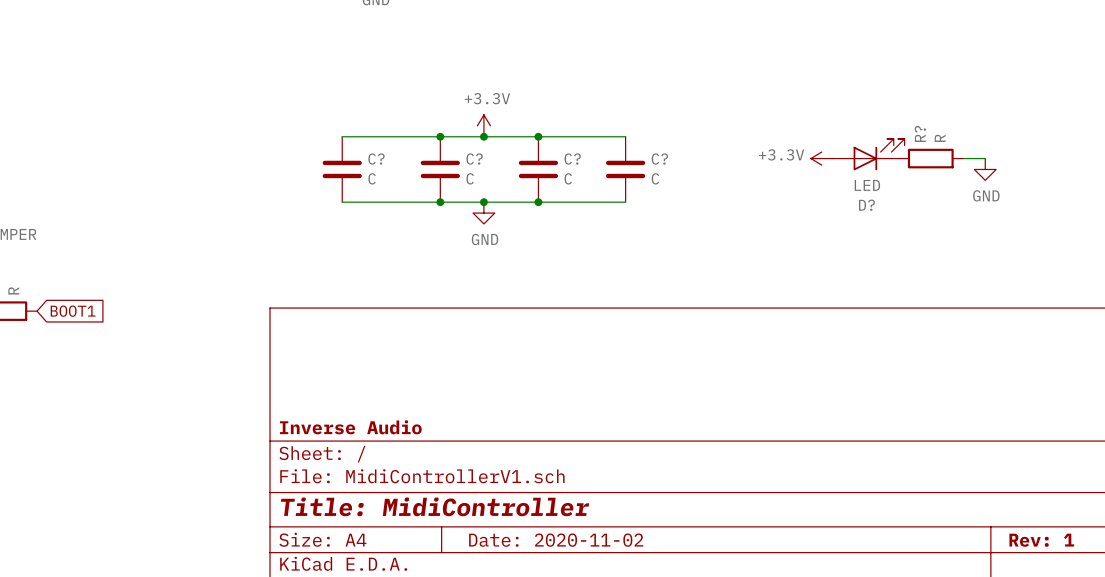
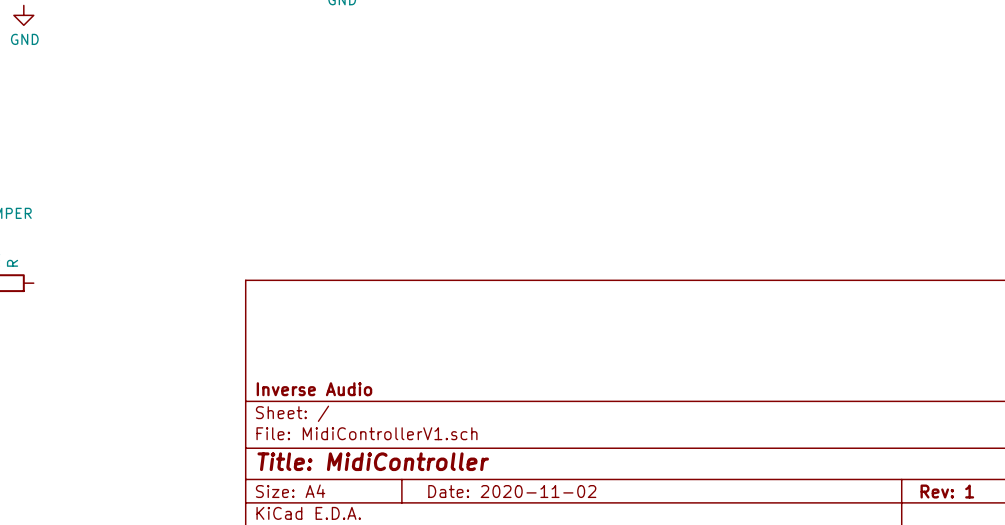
power symbol: none -> GND (23, 15)
power symbol: +3.3V (483, 125) -> none
wire: (342, 136) (625, 136) -> none
junction: (440, 136) -> none
junction: (483, 136) -> none
junction: (538, 136) -> none
D?: LED (868, 154) -> none
power symbol: +3.3V (821, 158) -> none
R?: R (930, 158) -> none
wire: (963, 158) (985, 158) -> none
C?: C (342, 169) -> none
C?: C (440, 169) -> none
C?: C (538, 169) -> none
C?: C (625, 169) -> none
power symbol: GND (985, 169) -> none
wire: (342, 202) (625, 202) -> none
junction: (440, 202) -> none
junction: (483, 202) -> none
junction: (538, 202) -> none
power symbol: GND (483, 213) -> none
global label: BOOT1 (73, 311) -> none

